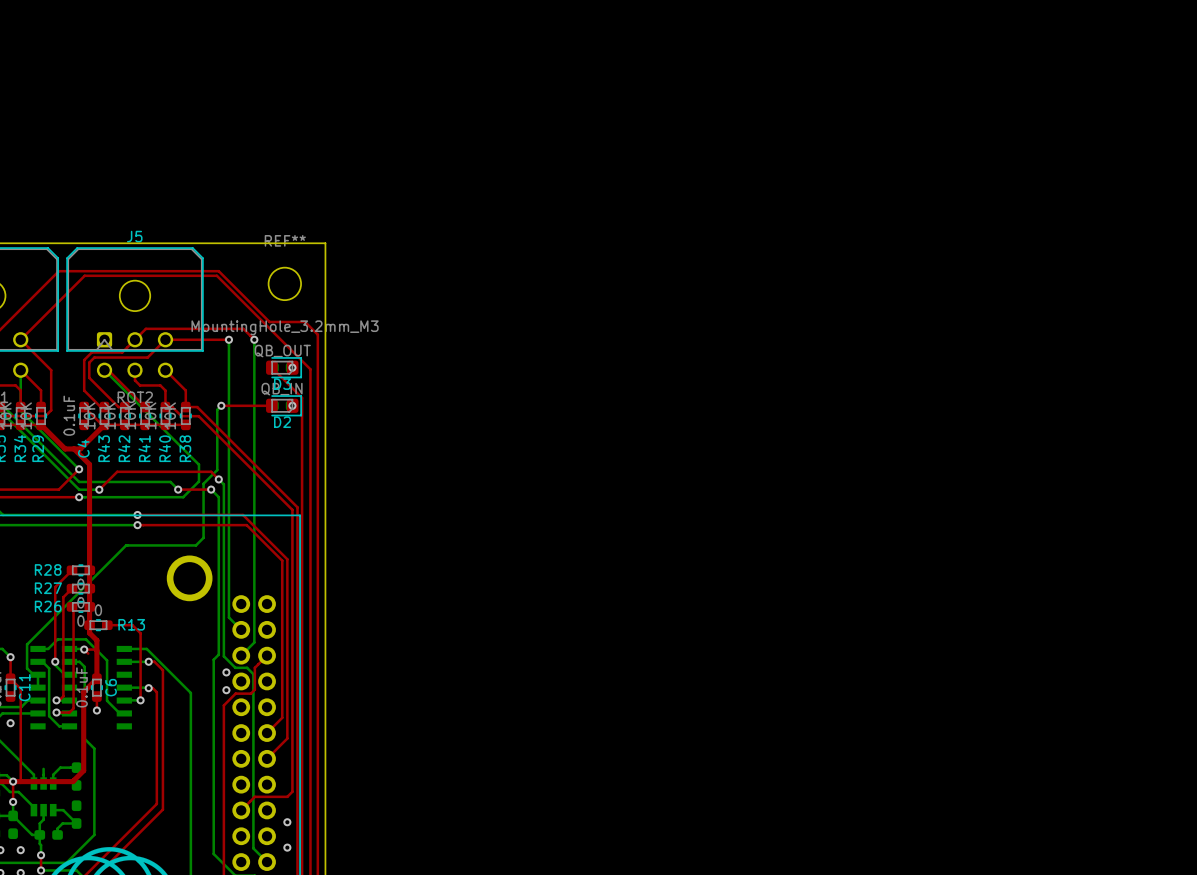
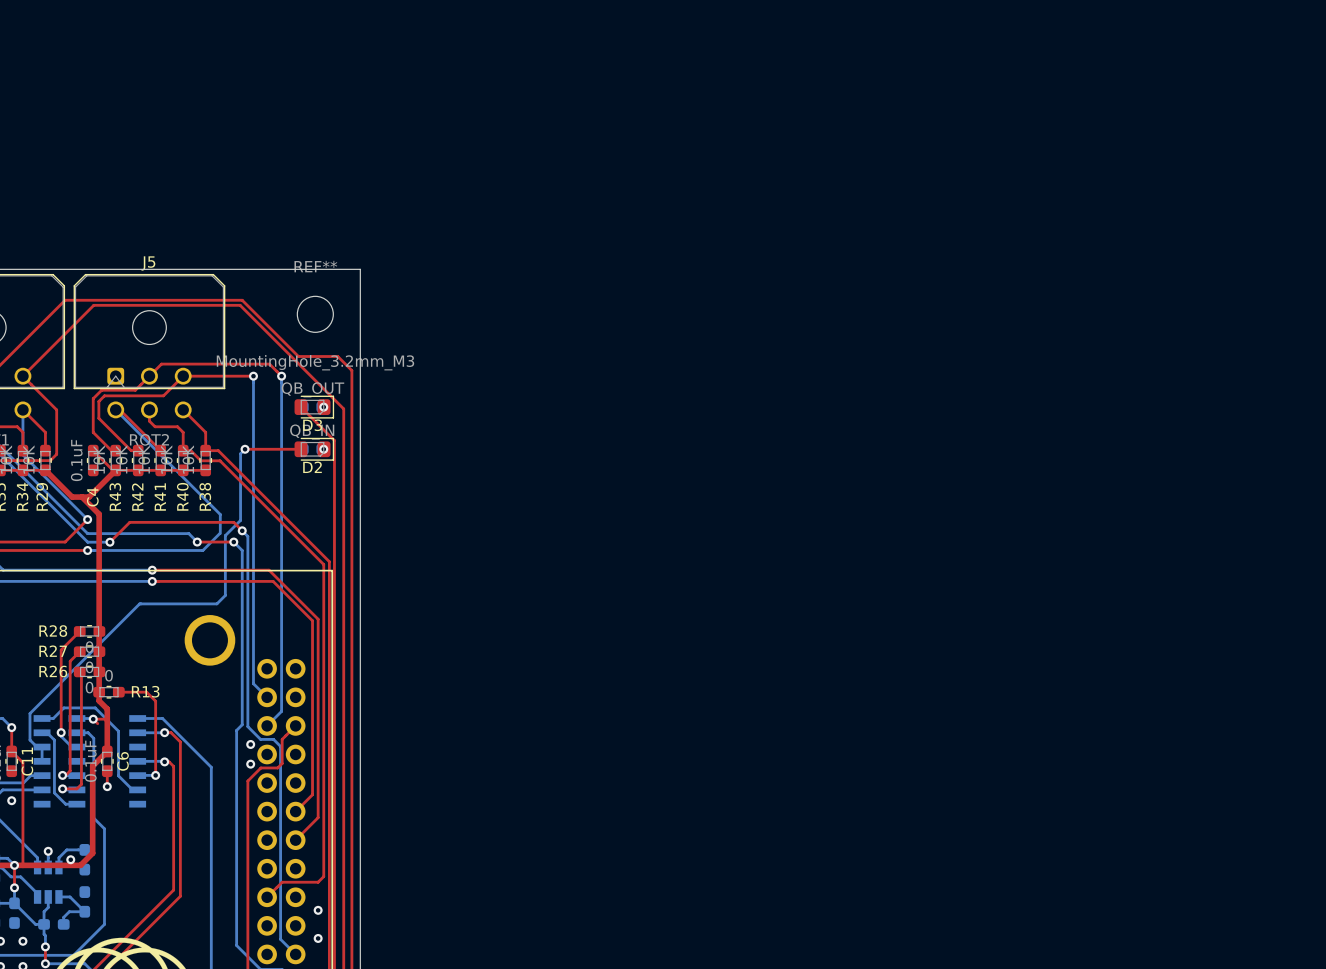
via: none -> (48, 851)
via: none -> (70, 859)

